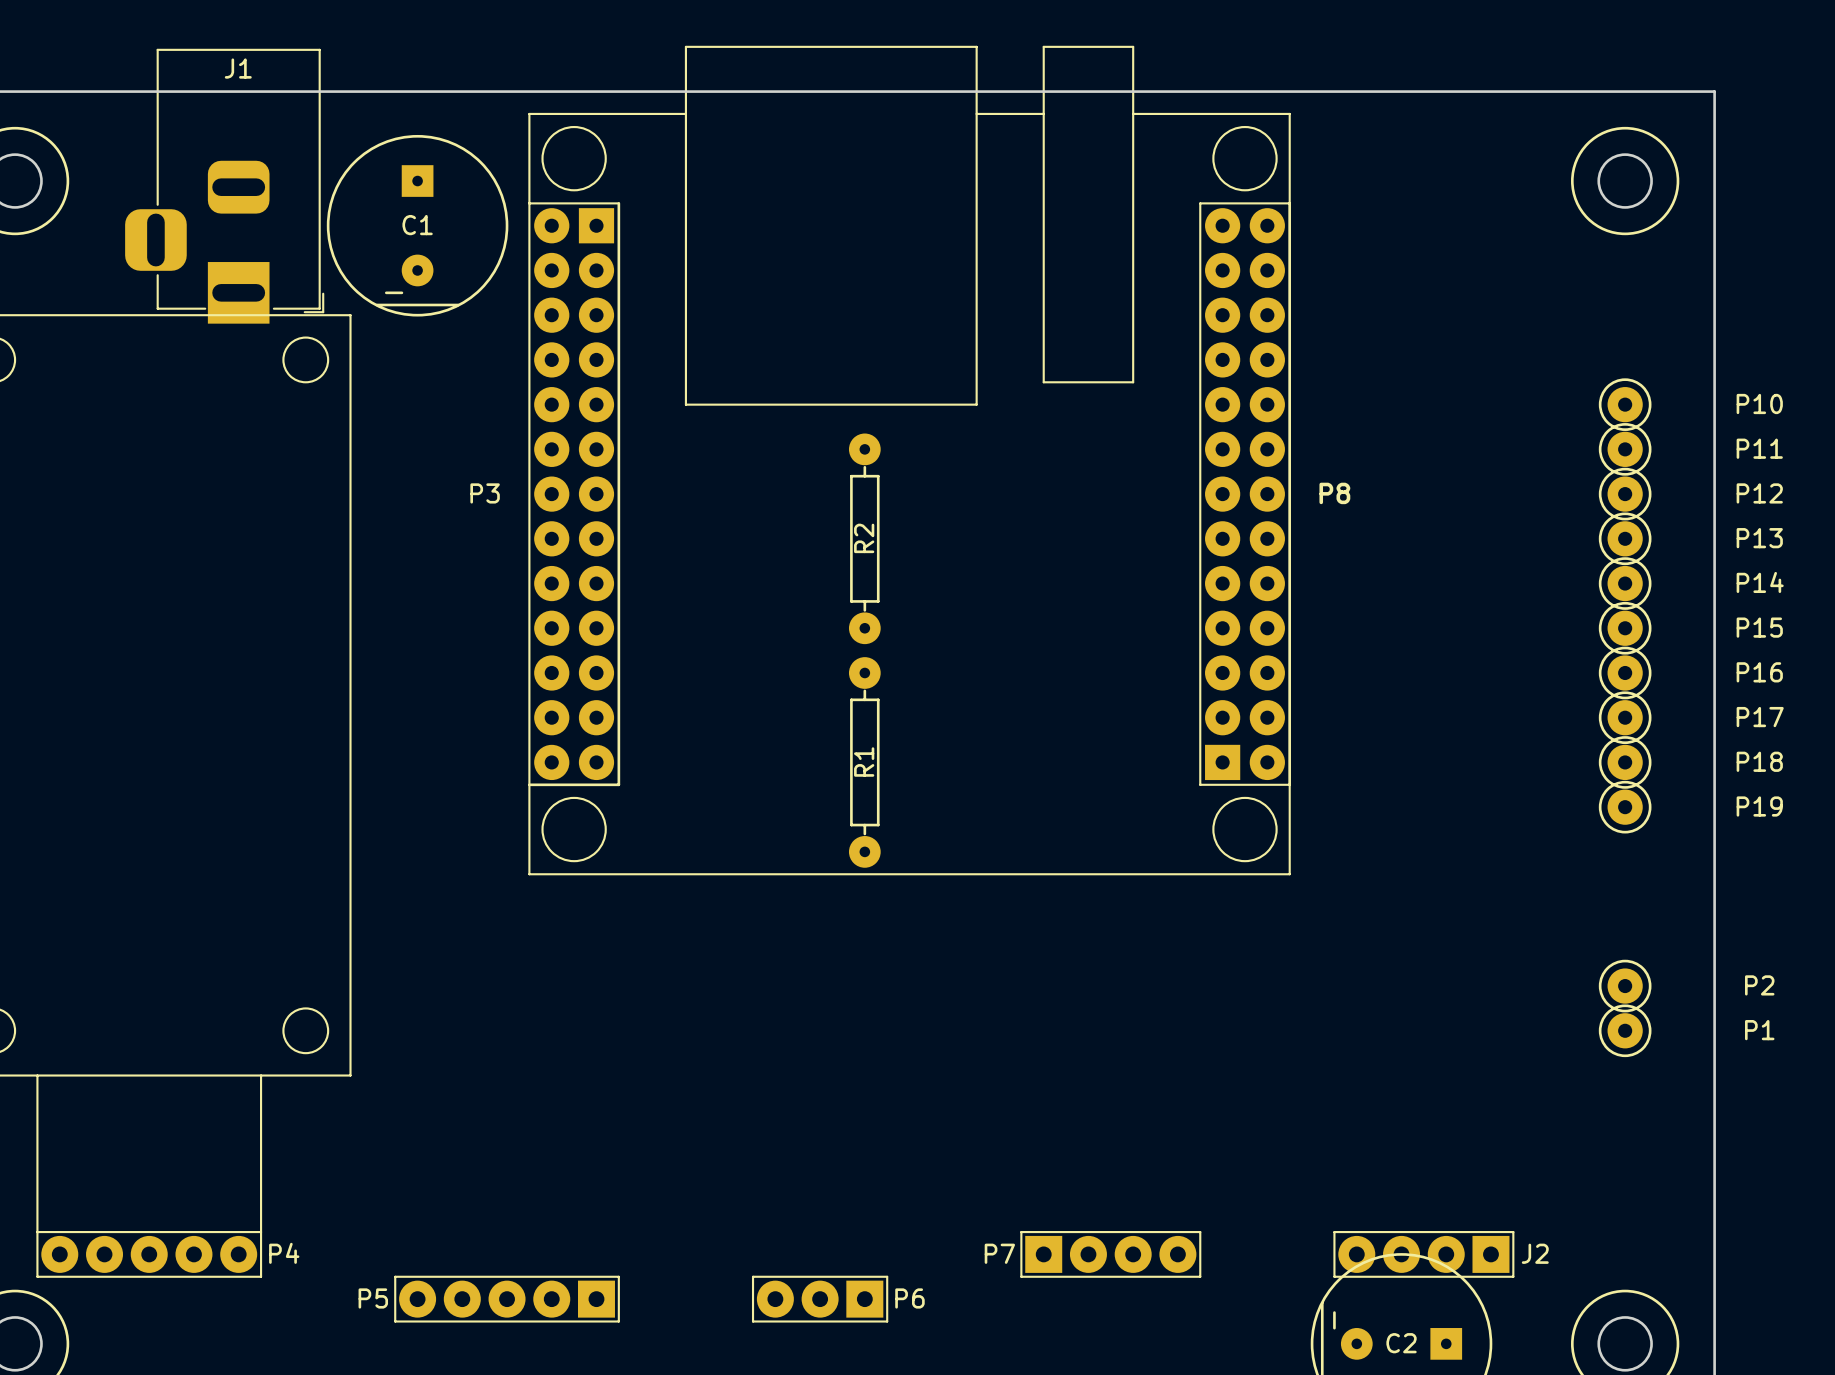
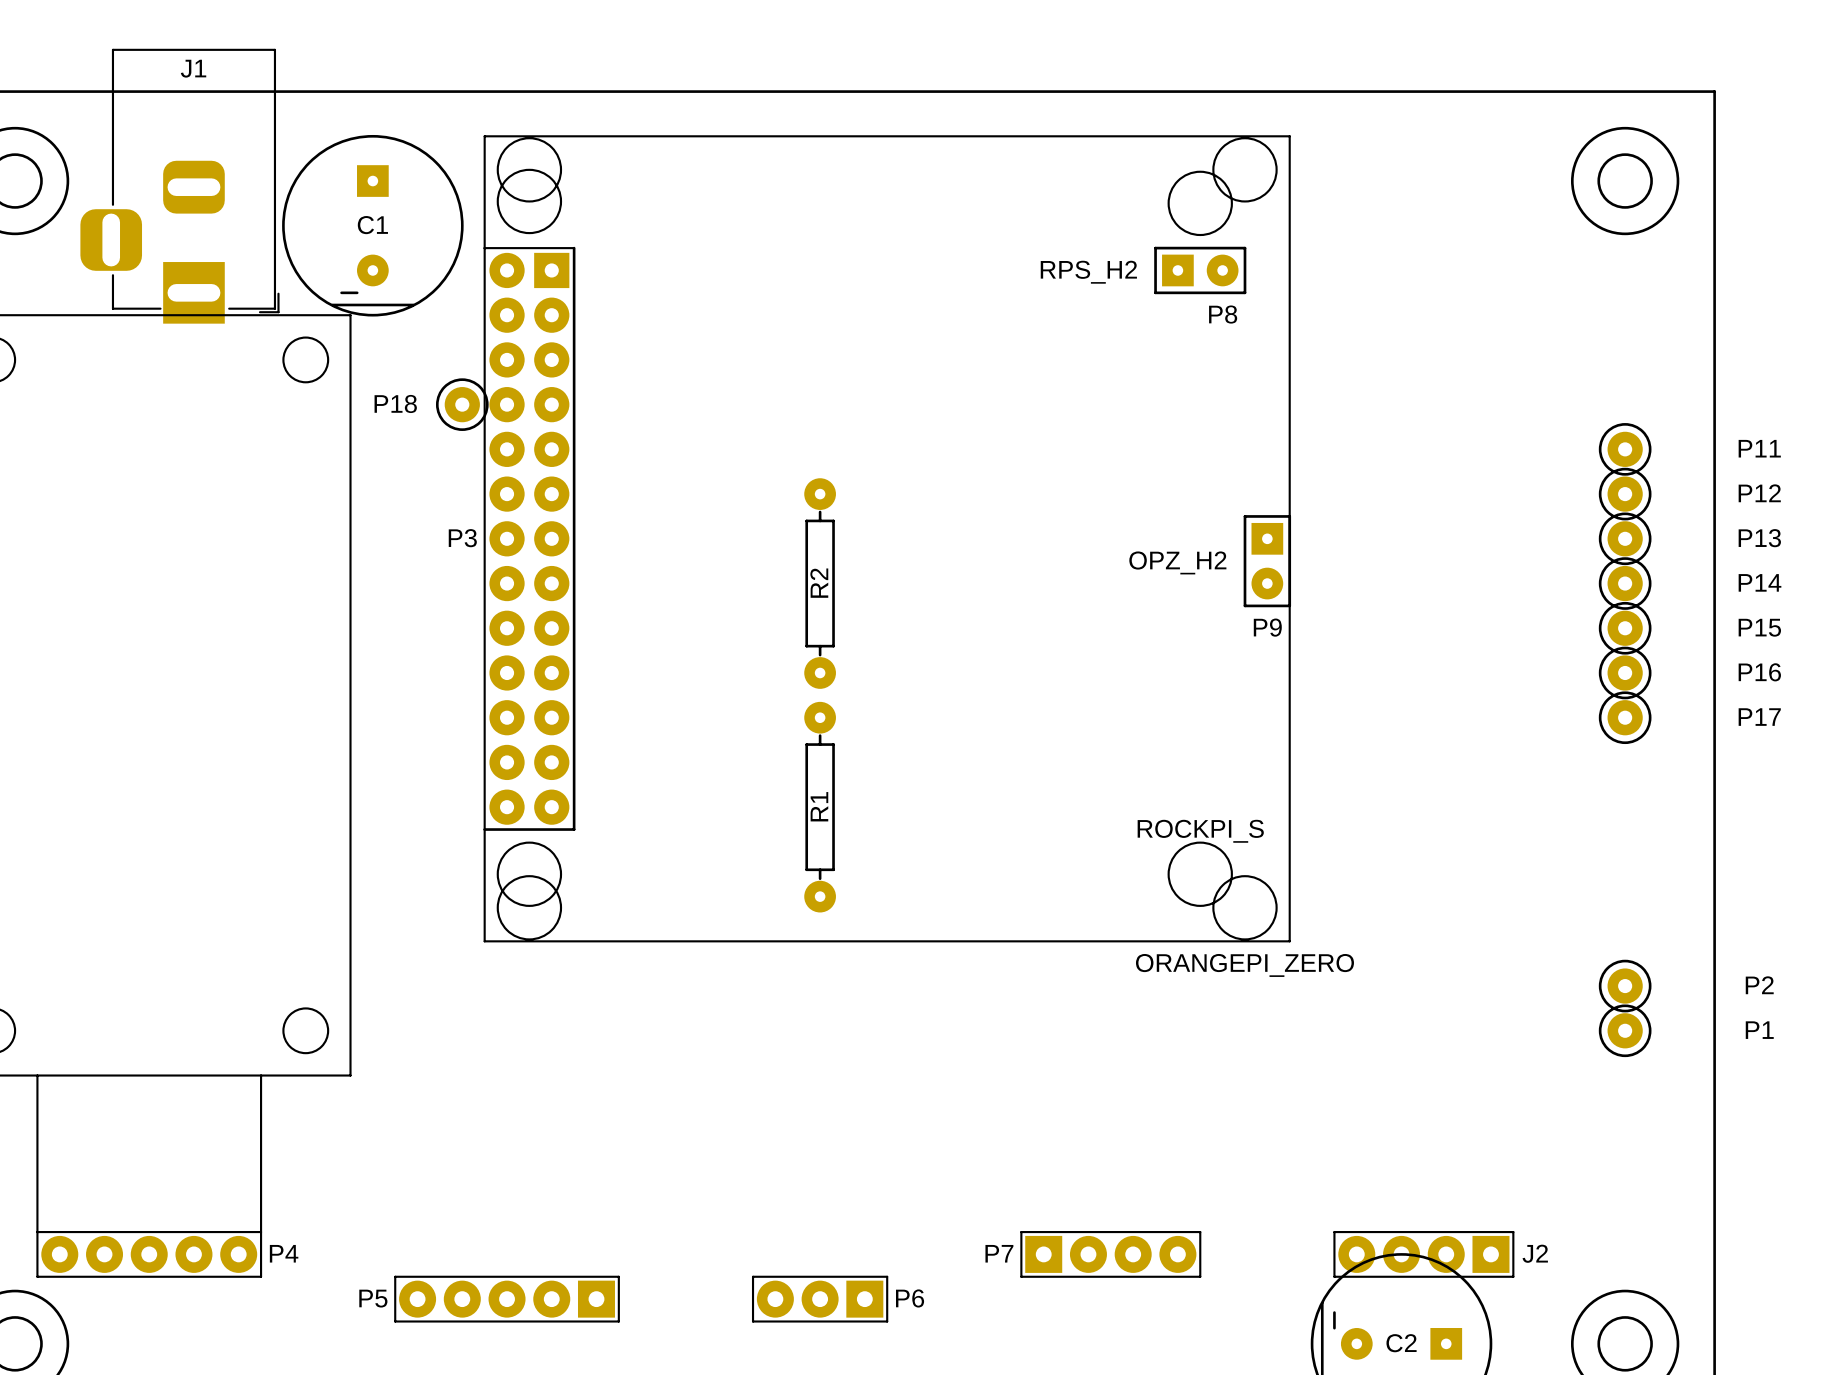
P3 footprint: [528, 45, 1291, 876] -> [483, 135, 1291, 943]
J1 position: (224, 186) -> (179, 186)
P8 footprint: [1199, 202, 1291, 786] -> [1154, 246, 1247, 295]
C1 position: (417, 225) -> (372, 225)
P10: (1625, 404) -> none
P8 name position: P8 (1334, 493) -> P8 (1223, 314)
R2 position: (864, 538) -> (820, 583)
P9: none -> (1267, 561)
P18 name position: P18 (1759, 761) -> P18 (395, 403)
R1 position: (864, 762) -> (820, 807)
P18 position: (1625, 762) -> (462, 404)
P19: (1625, 807) -> none

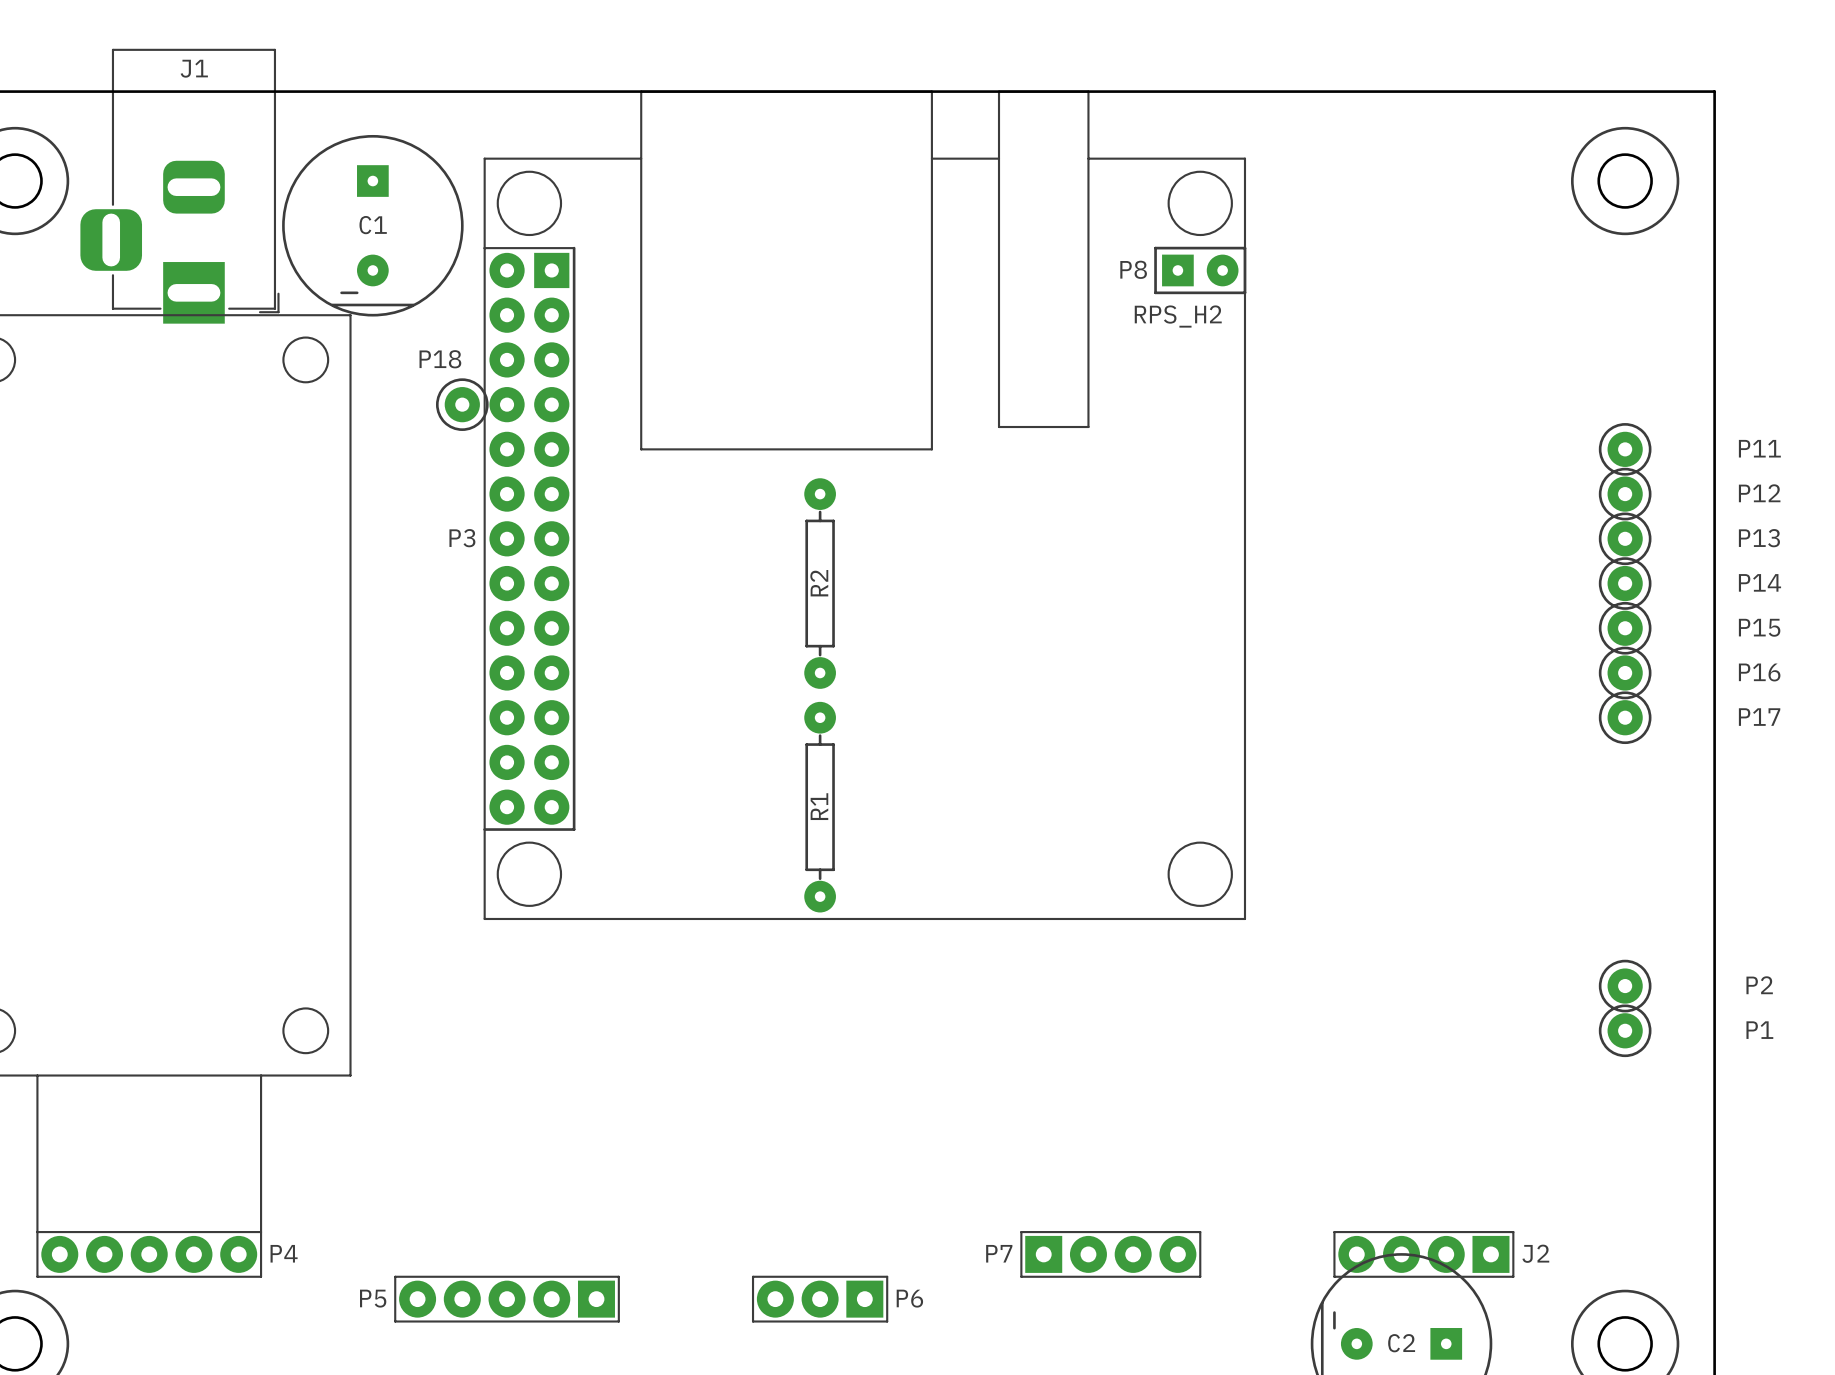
P3 footprint: [483, 135, 1291, 943] -> [483, 90, 1247, 921]
P8 text position: RPS_H2 (1088, 272) -> RPS_H2 (1178, 316)
P8 name position: P8 (1223, 314) -> P8 (1133, 269)
P18 name position: P18 (395, 403) -> P18 (440, 359)
P9: (1267, 561) -> none

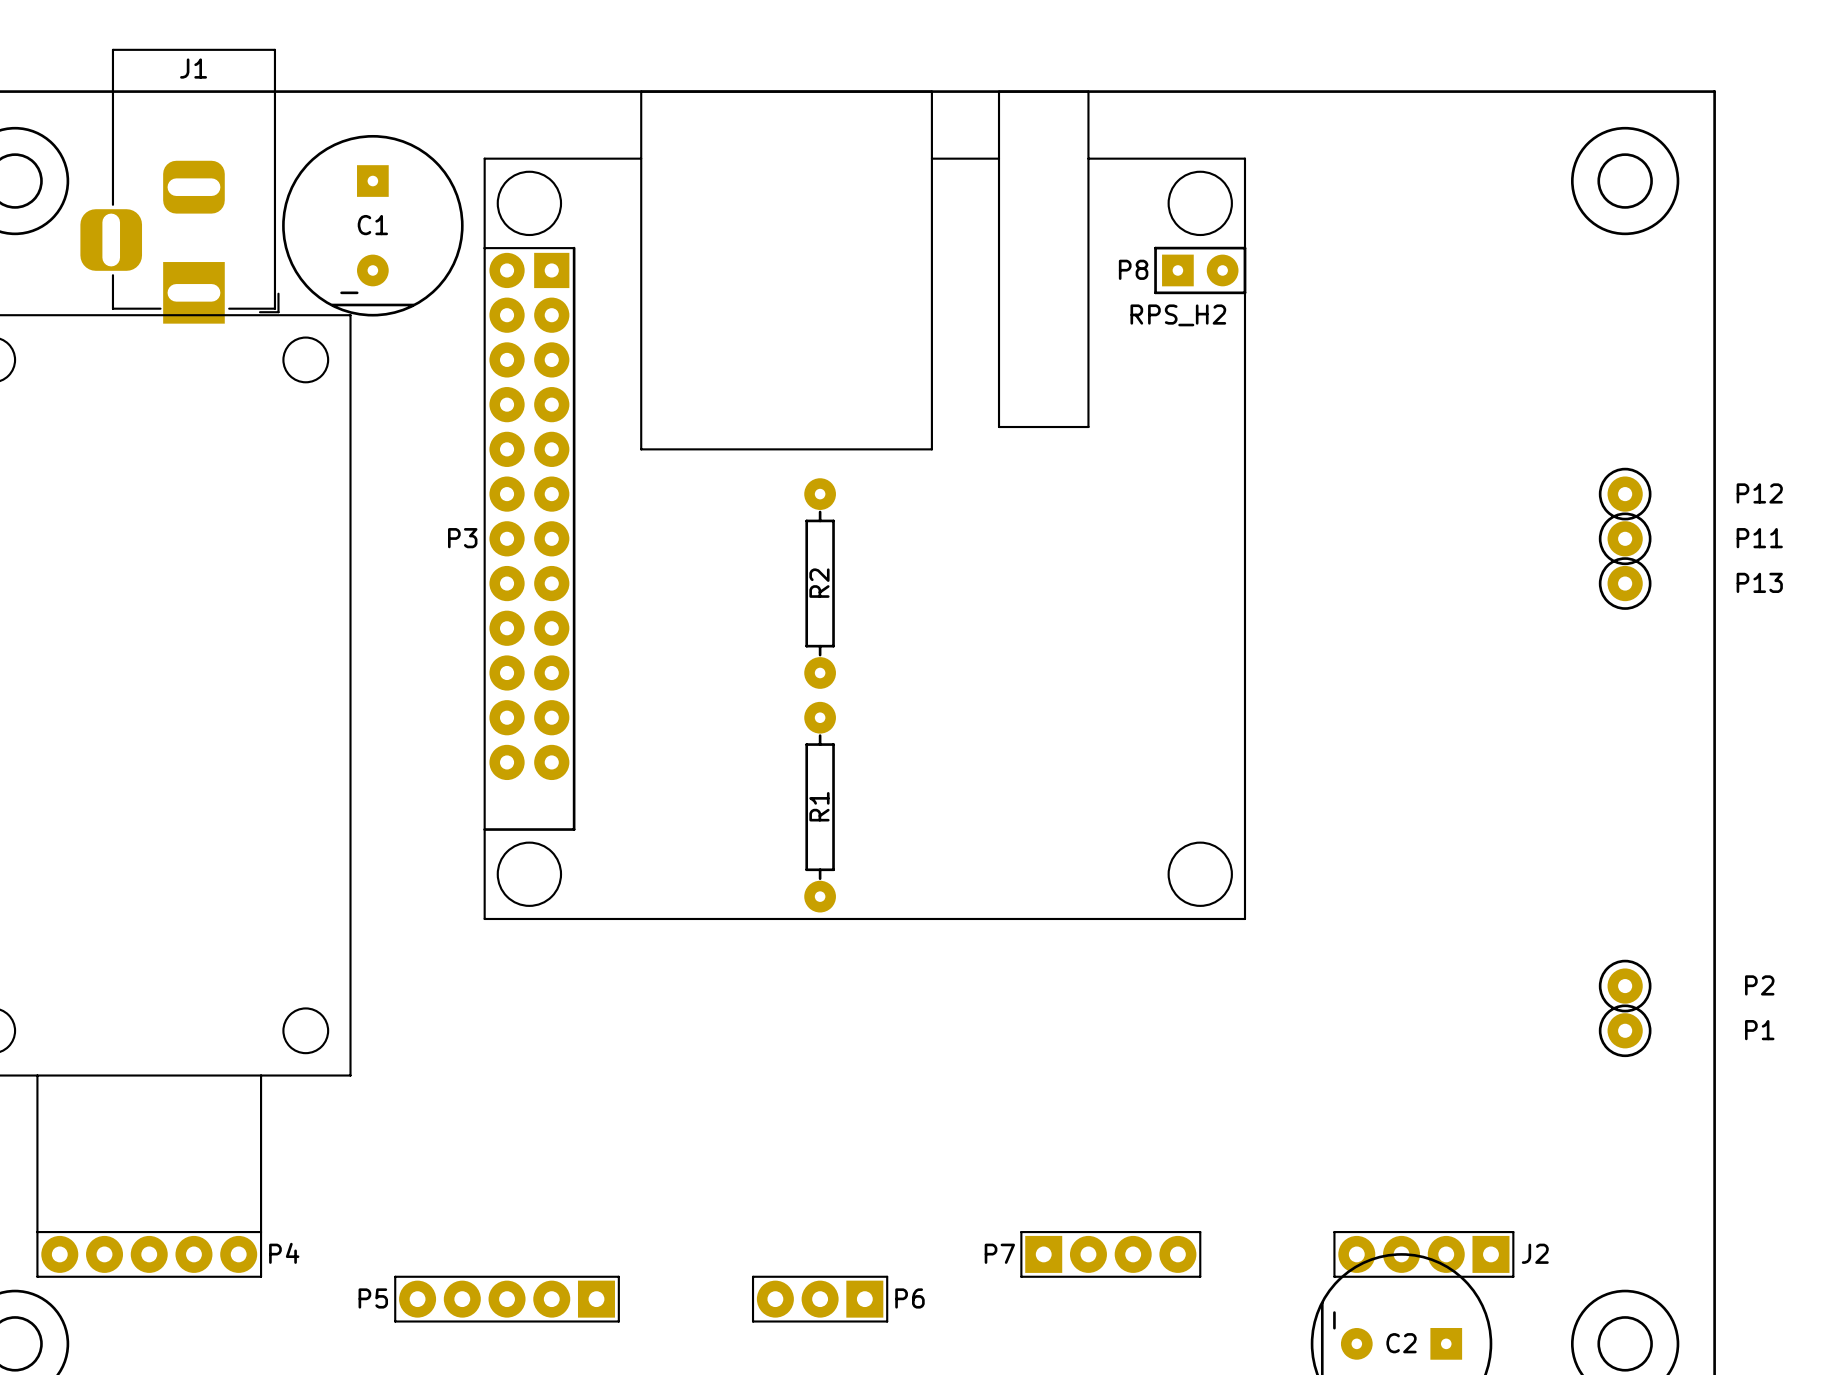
P3 footprint: [483, 90, 1247, 921] -> [483, 90, 1247, 921]
P18: (462, 404) -> none
P11: (1625, 449) -> none
P13 name: P13 (1759, 538) -> P11 (1759, 538)
P14 name: P14 (1759, 582) -> P13 (1759, 582)
P15: (1625, 628) -> none
P16: (1625, 672) -> none
P17: (1625, 717) -> none

